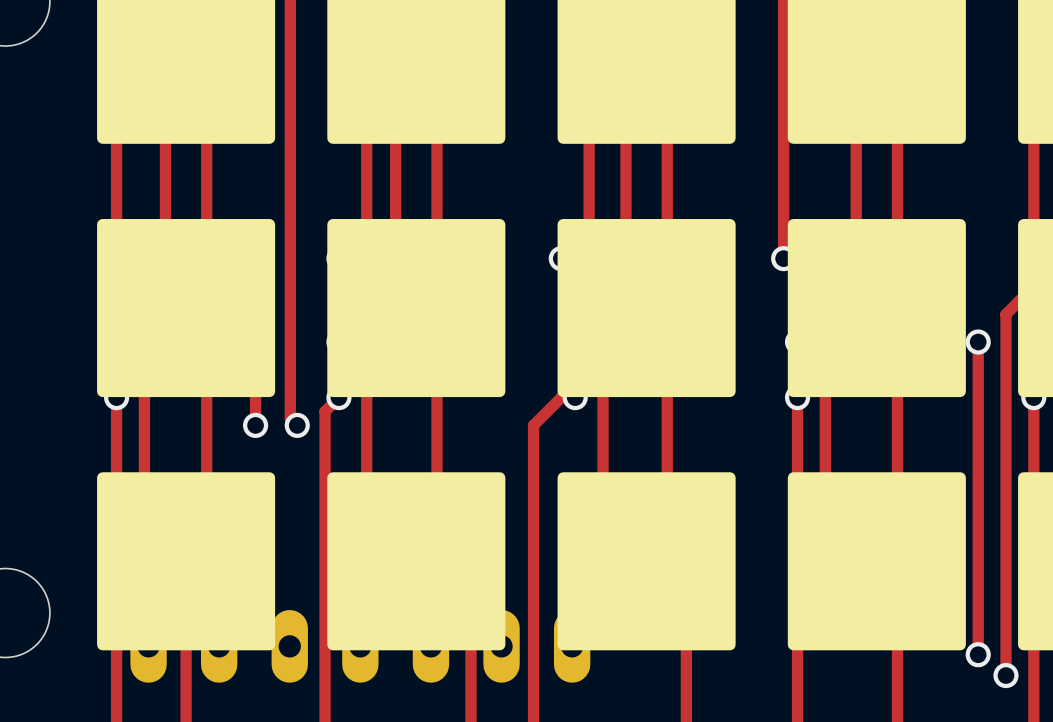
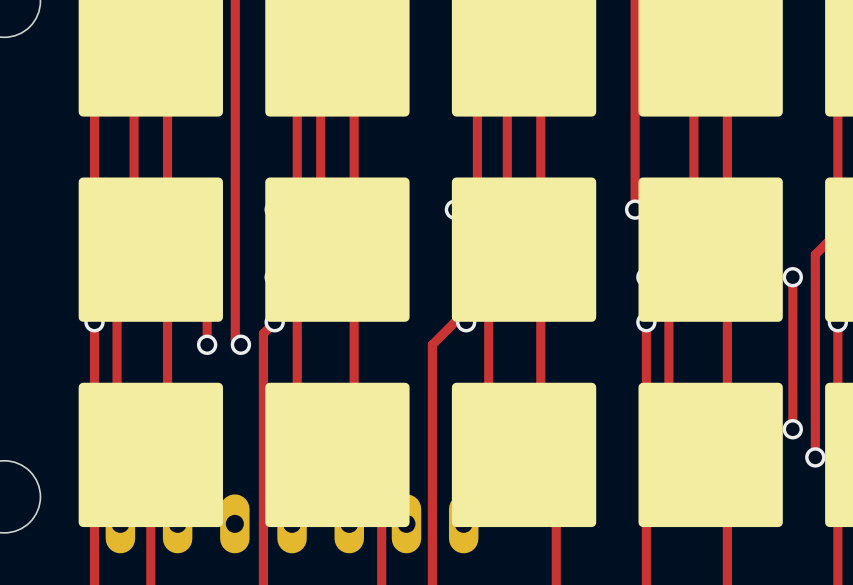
track: (978, 529) (978, 654) -> none
via: none -> (792, 429)
track: (1006, 564) (1006, 675) -> none
via: none -> (815, 457)
via: (978, 654) -> none
via: (1006, 675) -> none

